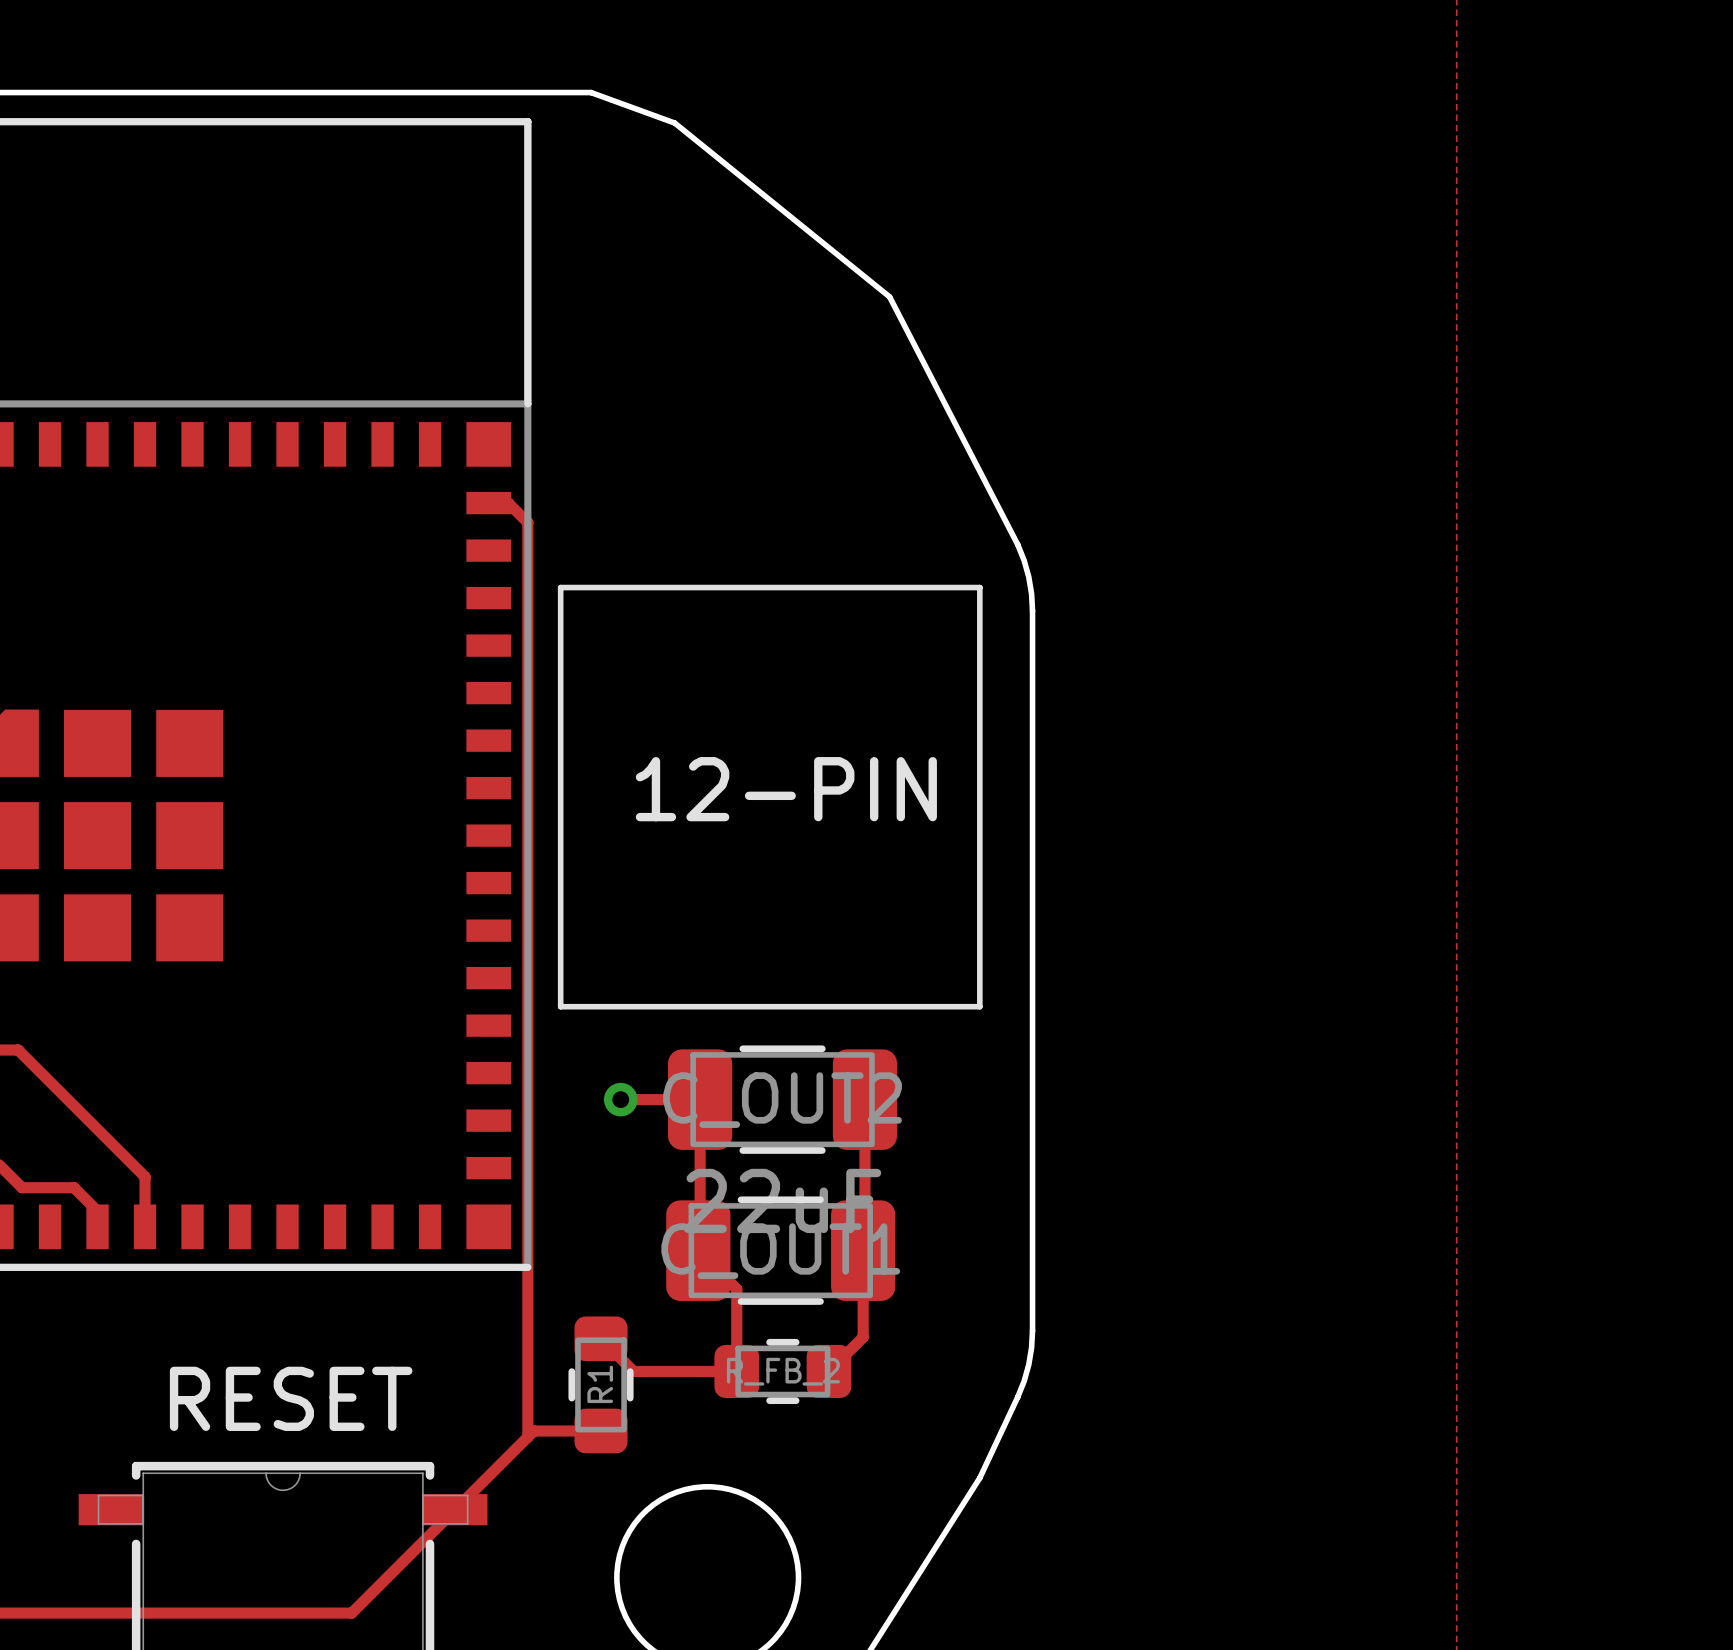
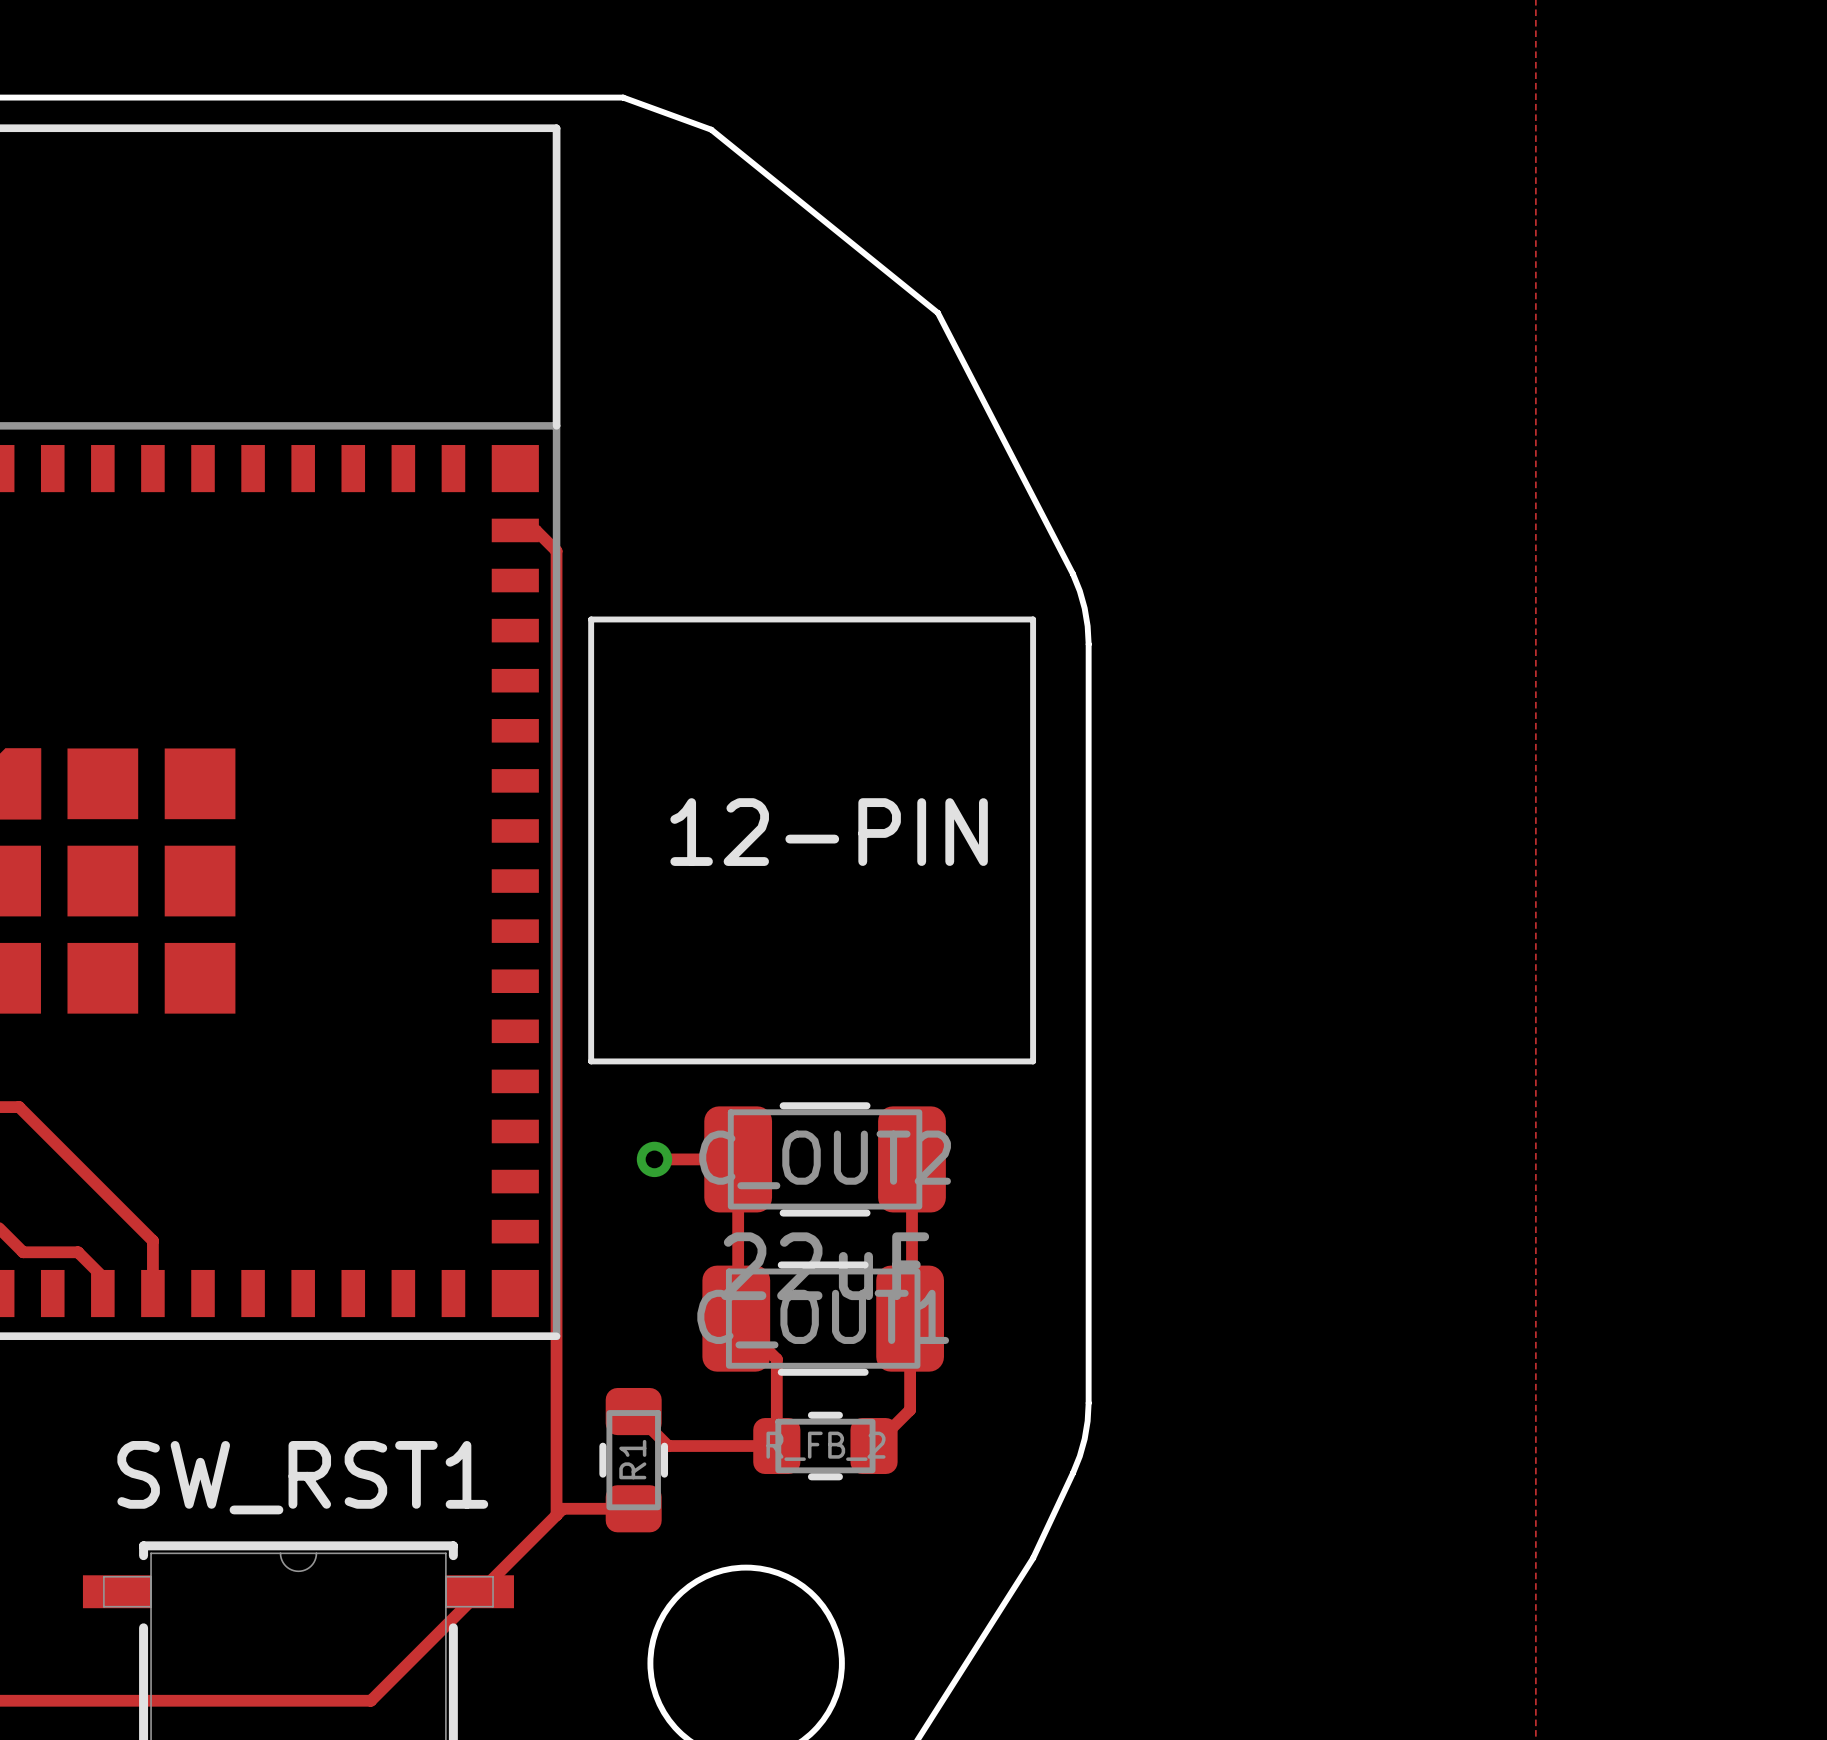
RESET name: RESET (291, 1398) -> SW_RST1 (302, 1477)

